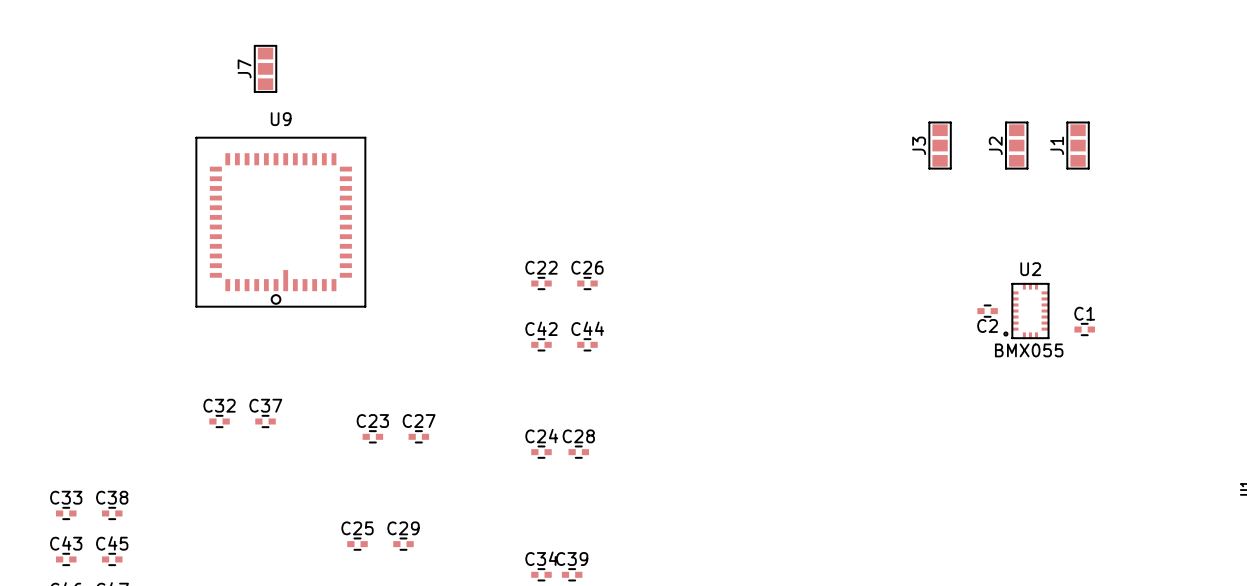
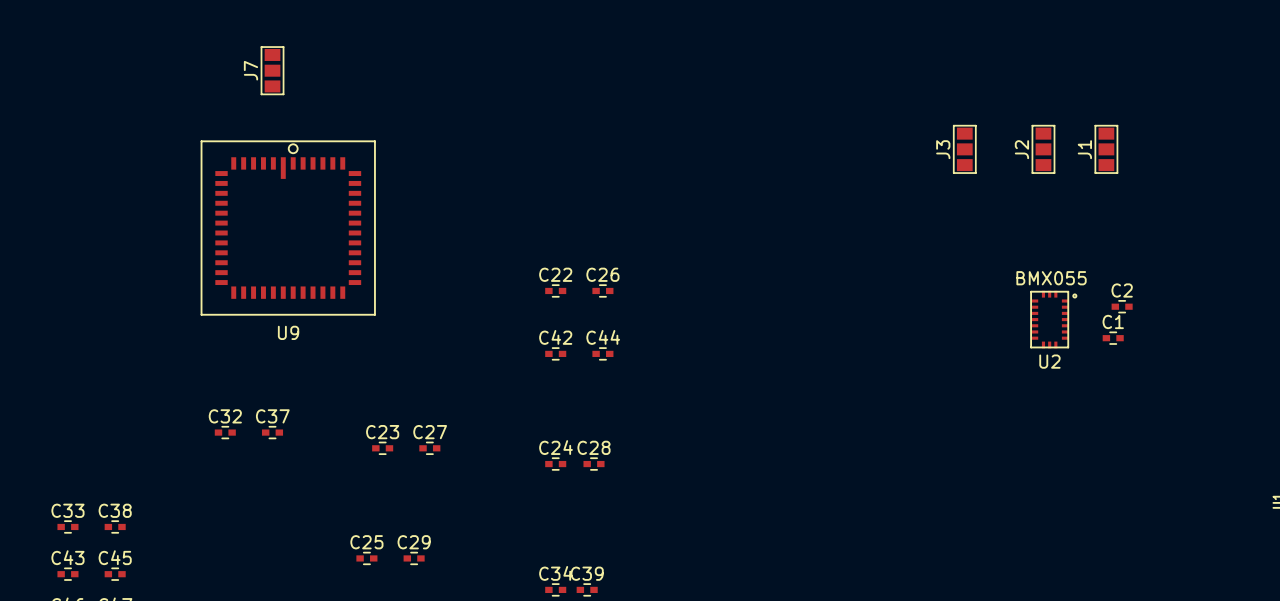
U9 rotation: 0° (280, 222) -> 180° (288, 228)
C2 position: (987, 311) -> (1122, 306)
U2 rotation: 0° (1026, 311) -> 180° (1053, 319)
C2 name position: C2 (987, 325) -> C2 (1122, 290)

